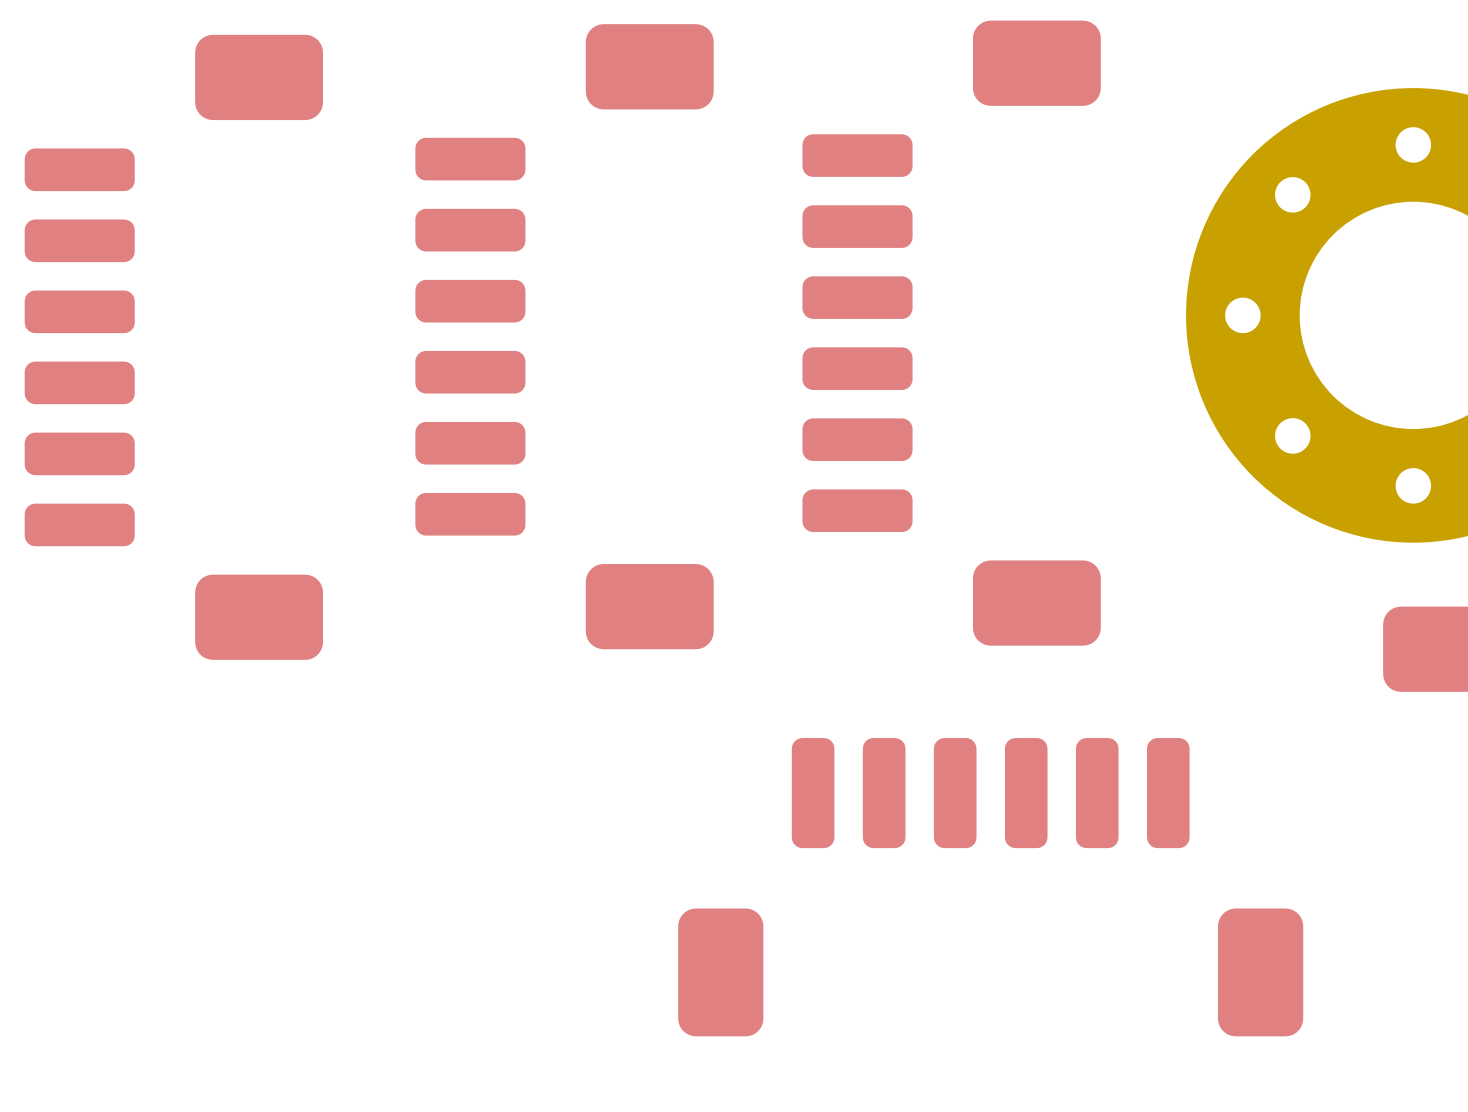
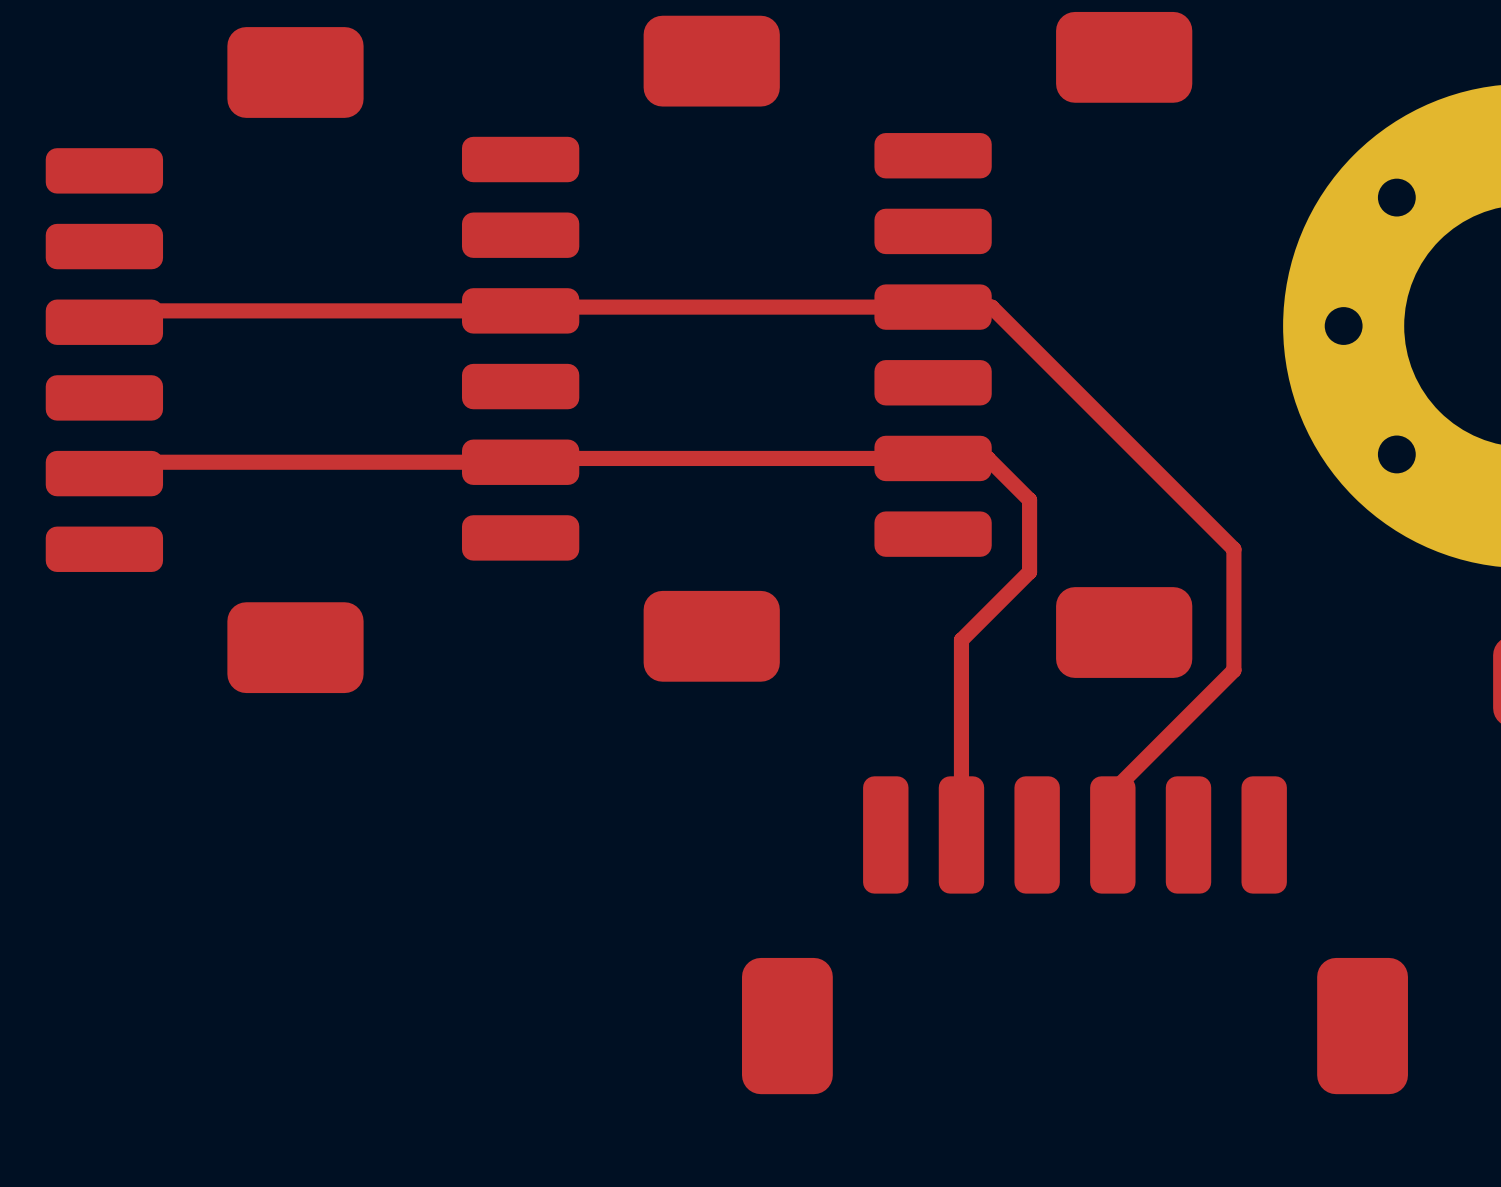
top track: none -> (104, 322) (115, 310) (520, 310) (524, 307) (991, 307) (1233, 549) (1233, 670) (1112, 791) (1112, 834)
top track: none -> (104, 473) (115, 462) (520, 462) (524, 458) (987, 458) (1029, 500) (1029, 571) (961, 640) (961, 834)

